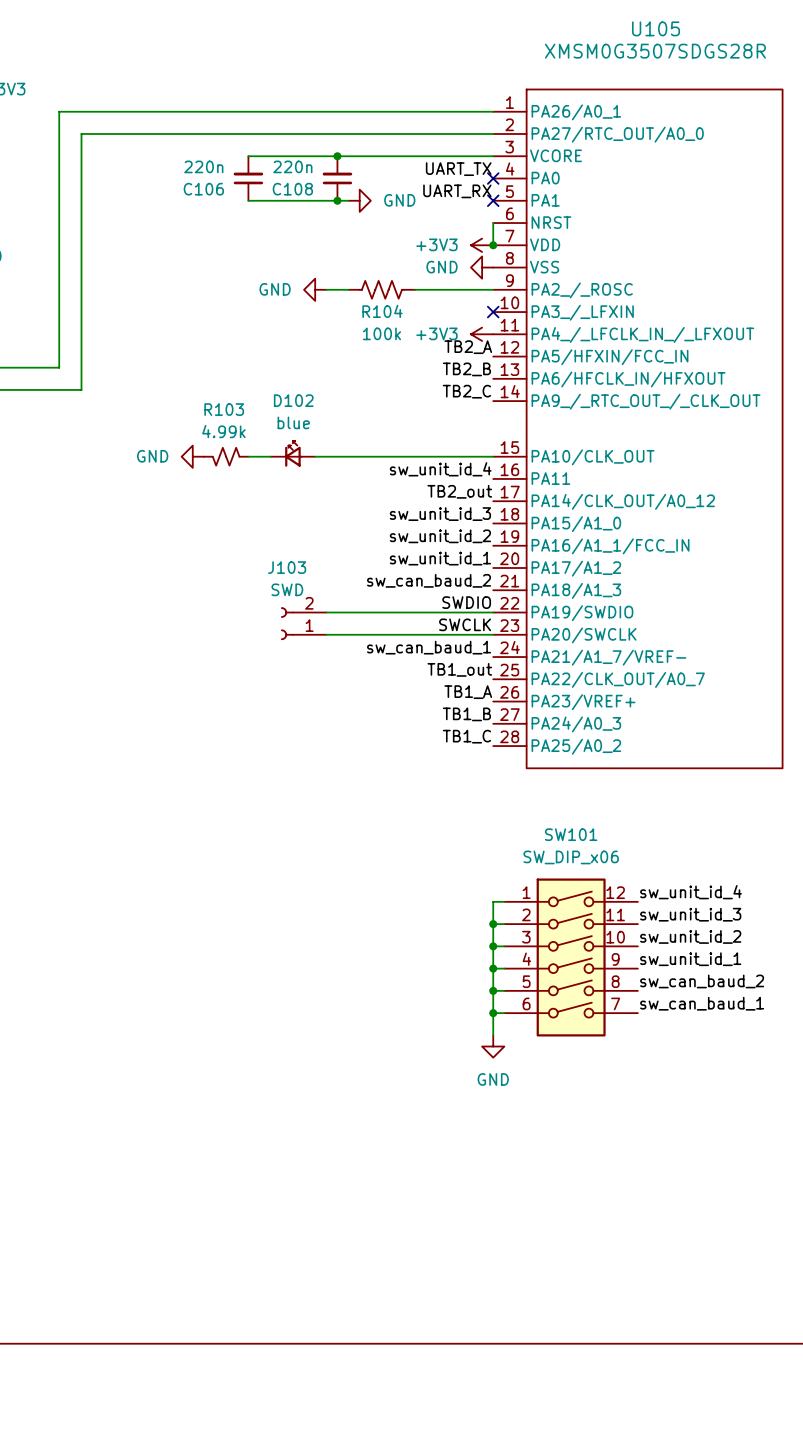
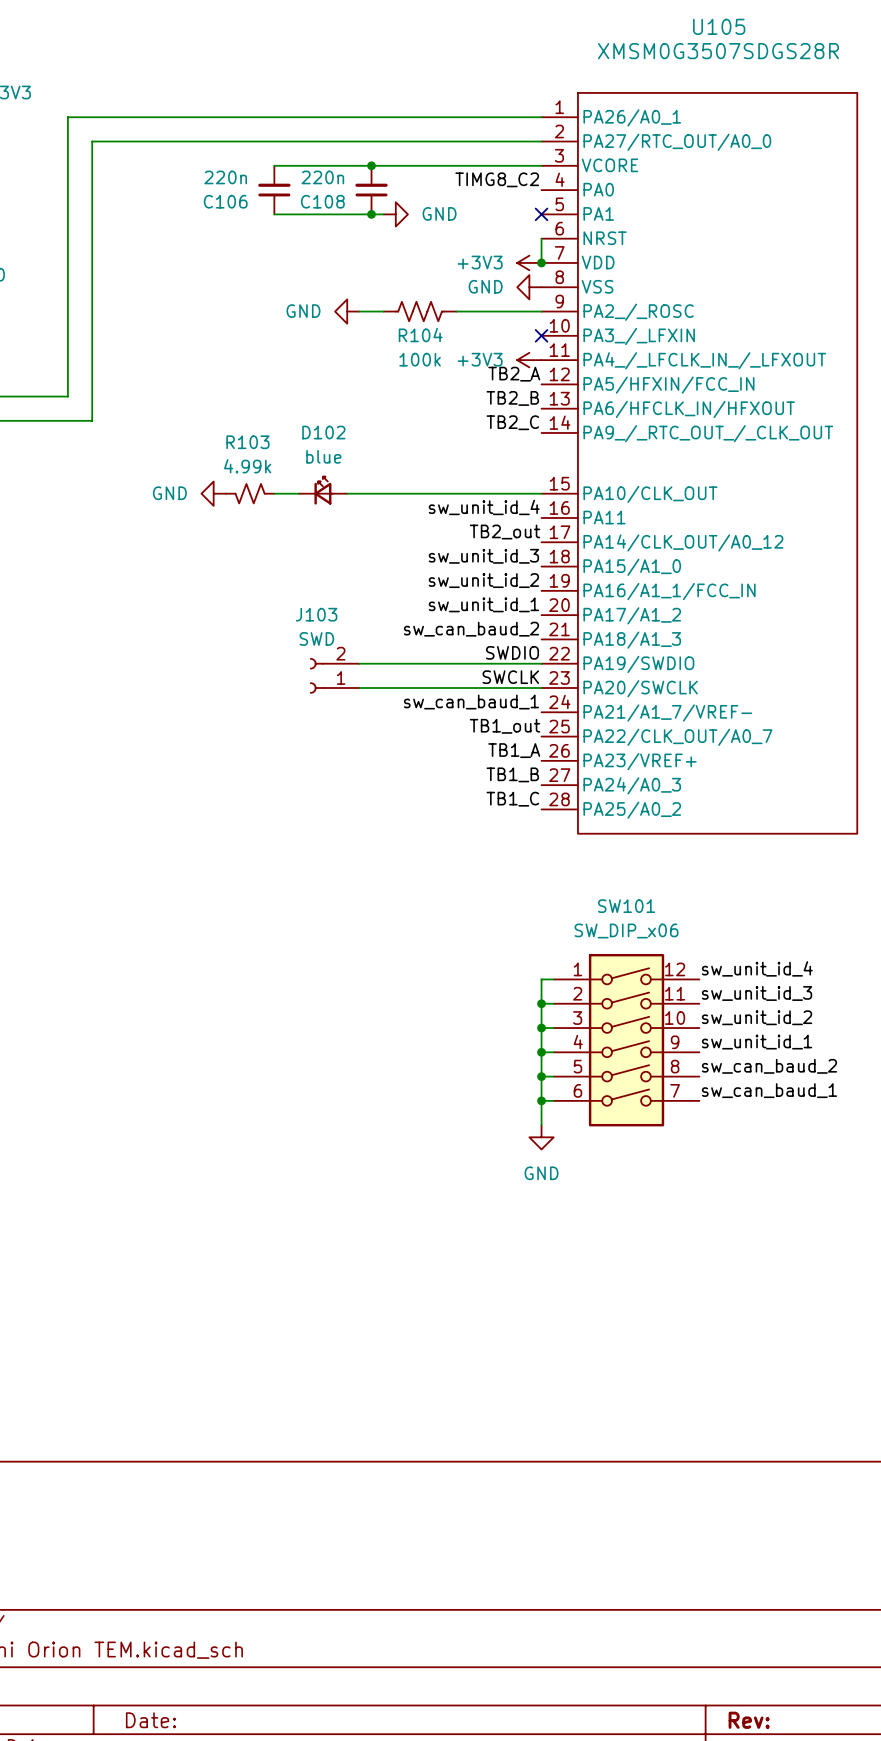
label: UART_TX (458, 169) -> TIMG8_C2 (497, 179)
no-connect mark: (493, 178) -> none
label: UART_RX (457, 191) -> none

